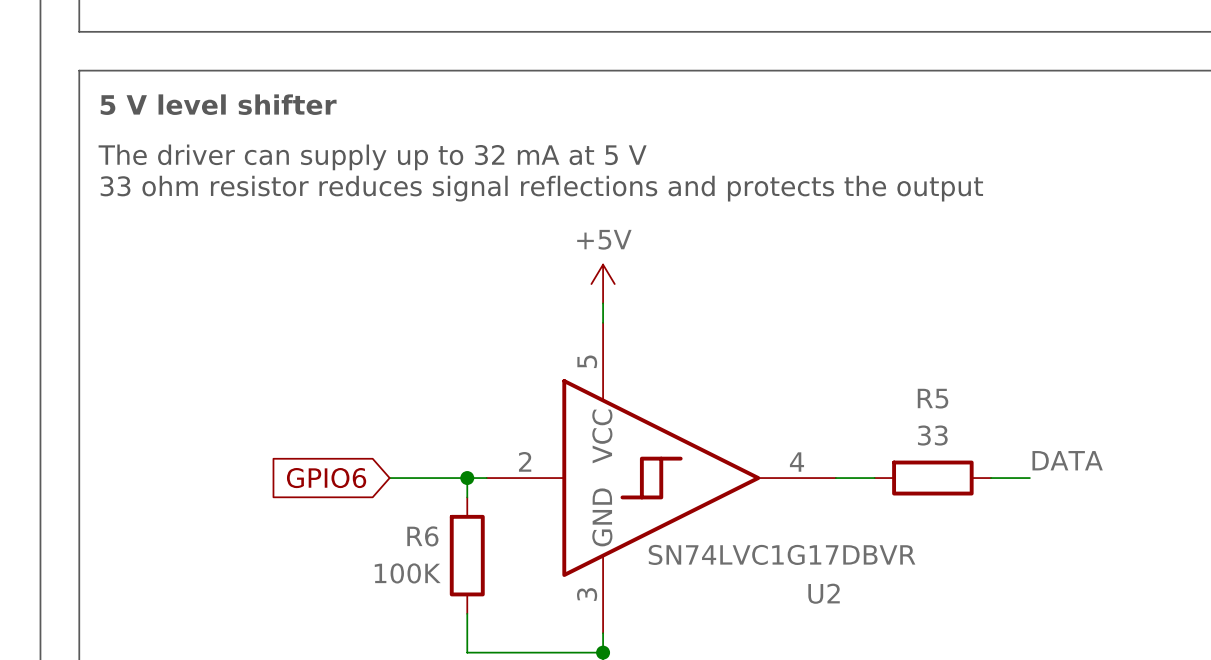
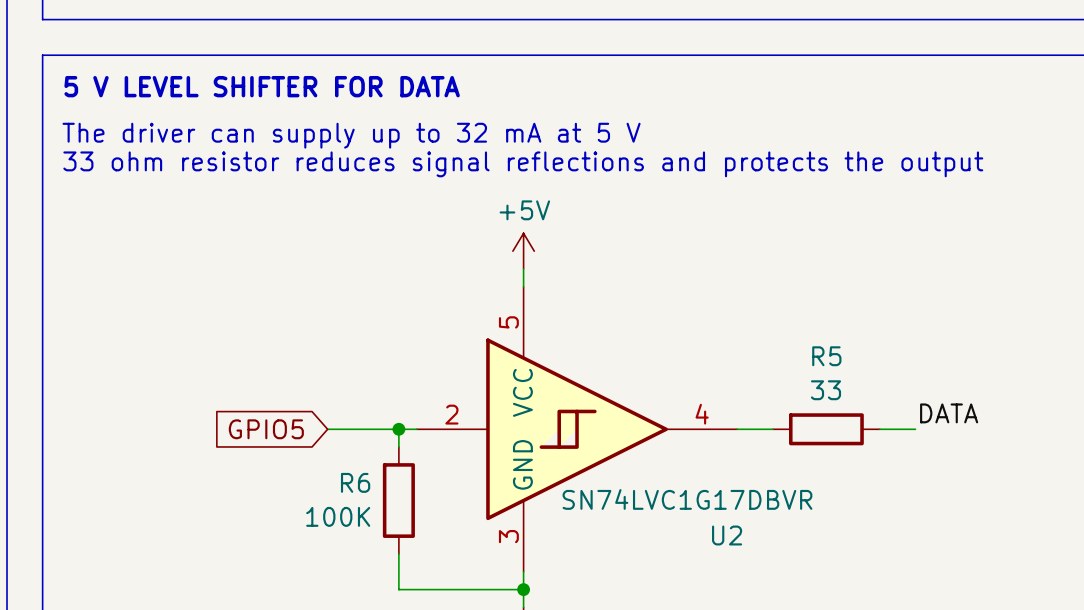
text: 5 V level shifter (218, 104) -> 5 V LEVEL SHIFTER FOR DATA (262, 86)
global label: GPIO6 (326, 478) -> GPIO5 (266, 429)

